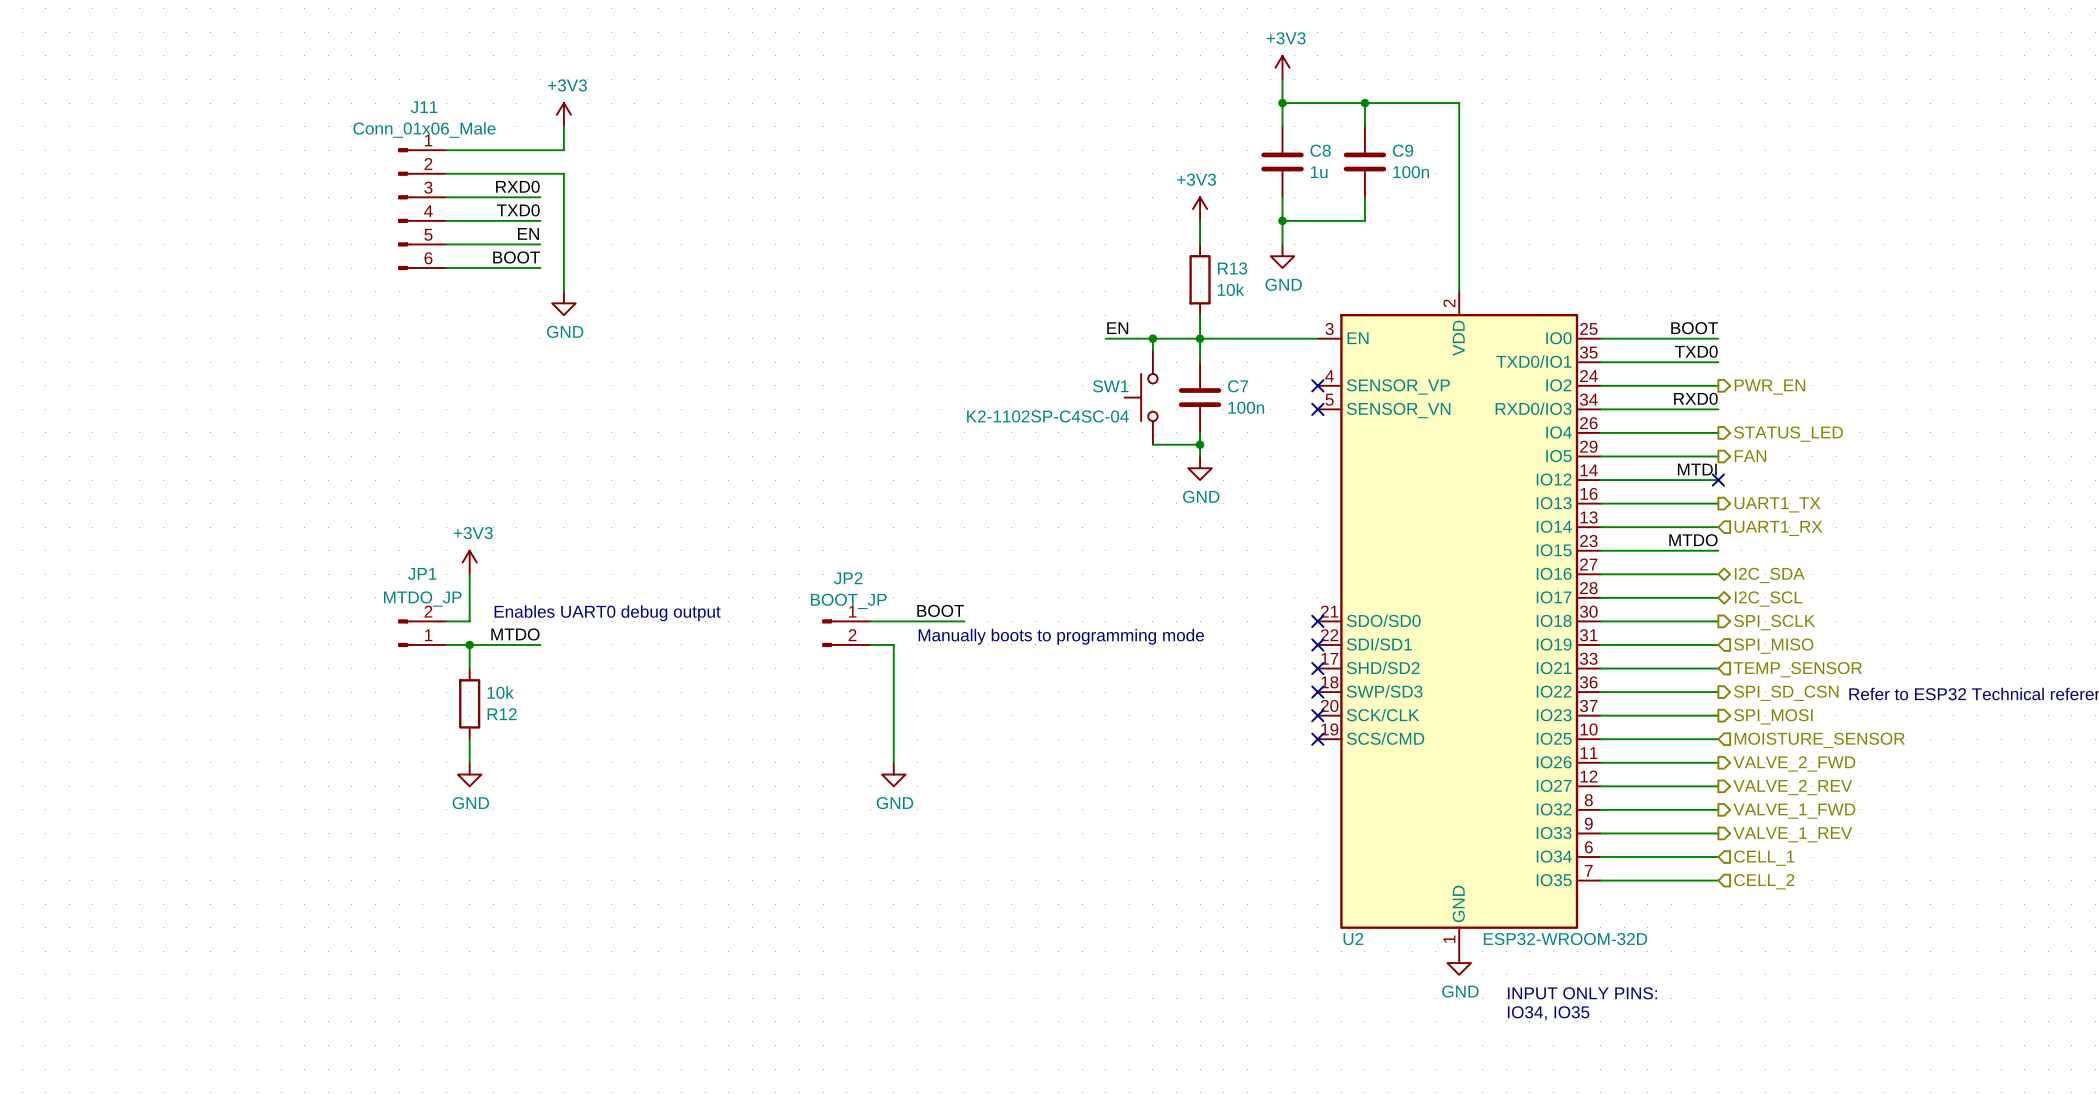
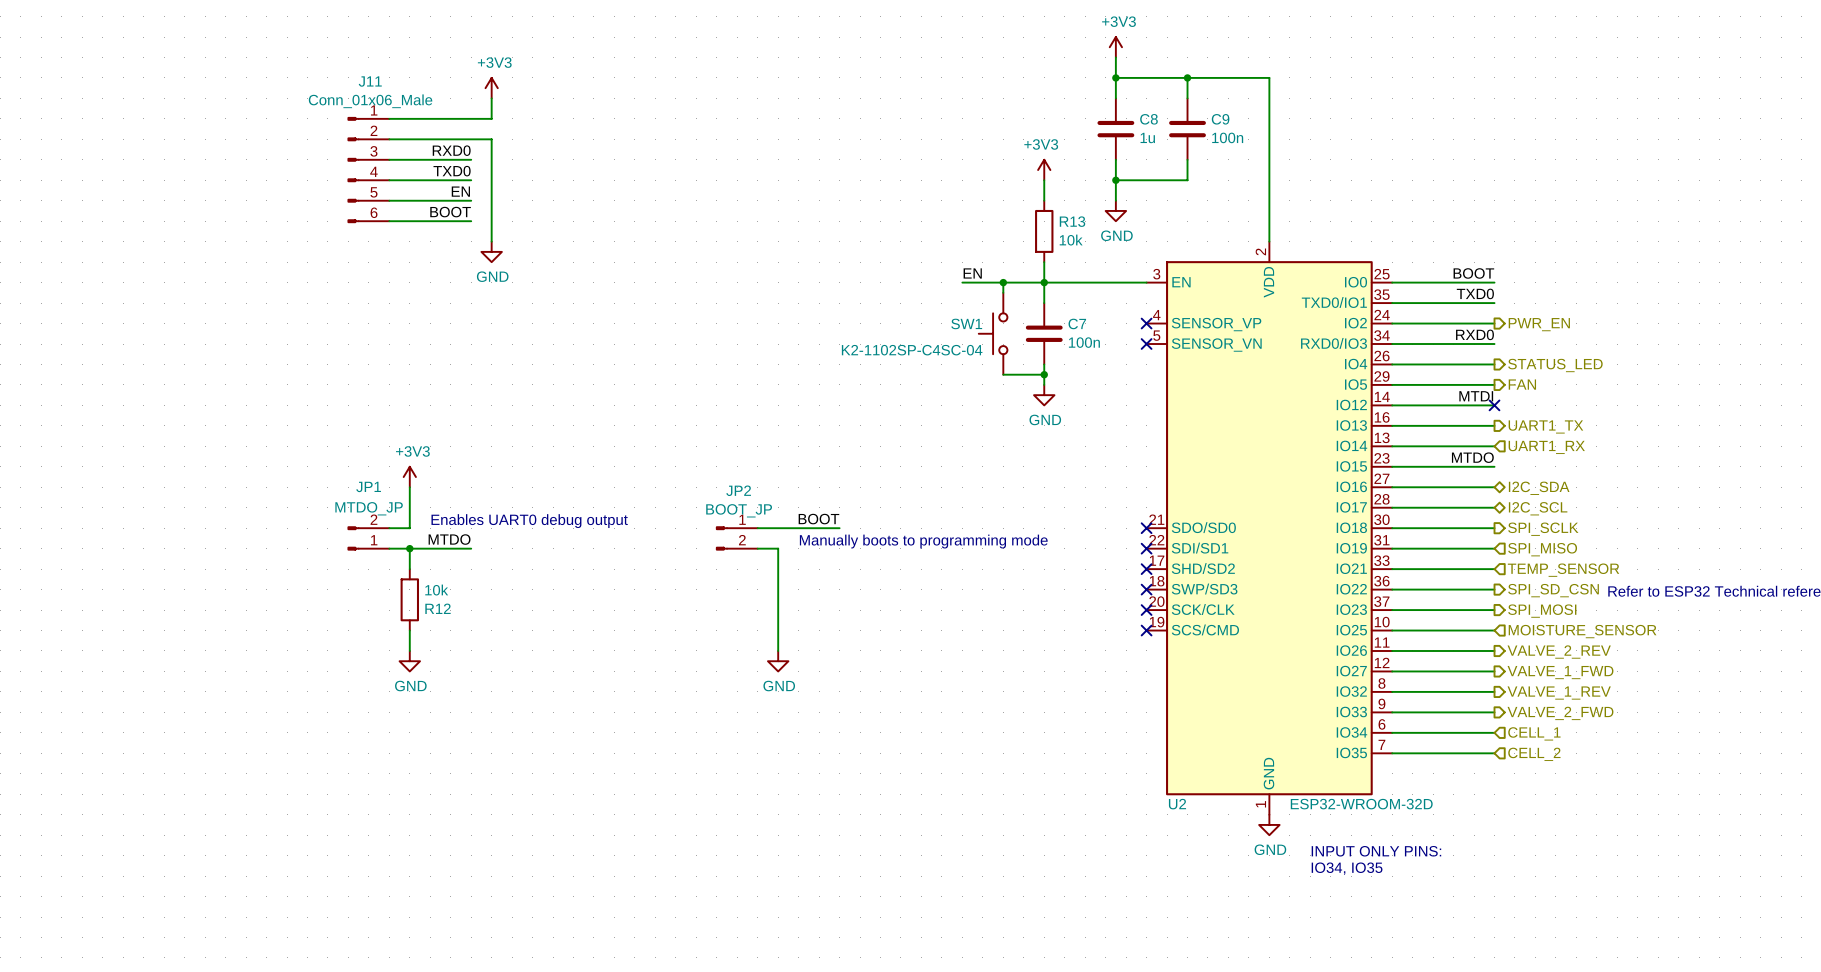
hierarchical label: VALVE_2_FWD (1794, 763) -> VALVE_2_REV (1559, 652)
hierarchical label: VALVE_2_REV (1792, 787) -> VALVE_1_FWD (1560, 672)
hierarchical label: VALVE_1_FWD (1794, 811) -> VALVE_1_REV (1559, 693)
hierarchical label: VALVE_1_REV (1792, 834) -> VALVE_2_FWD (1560, 713)

